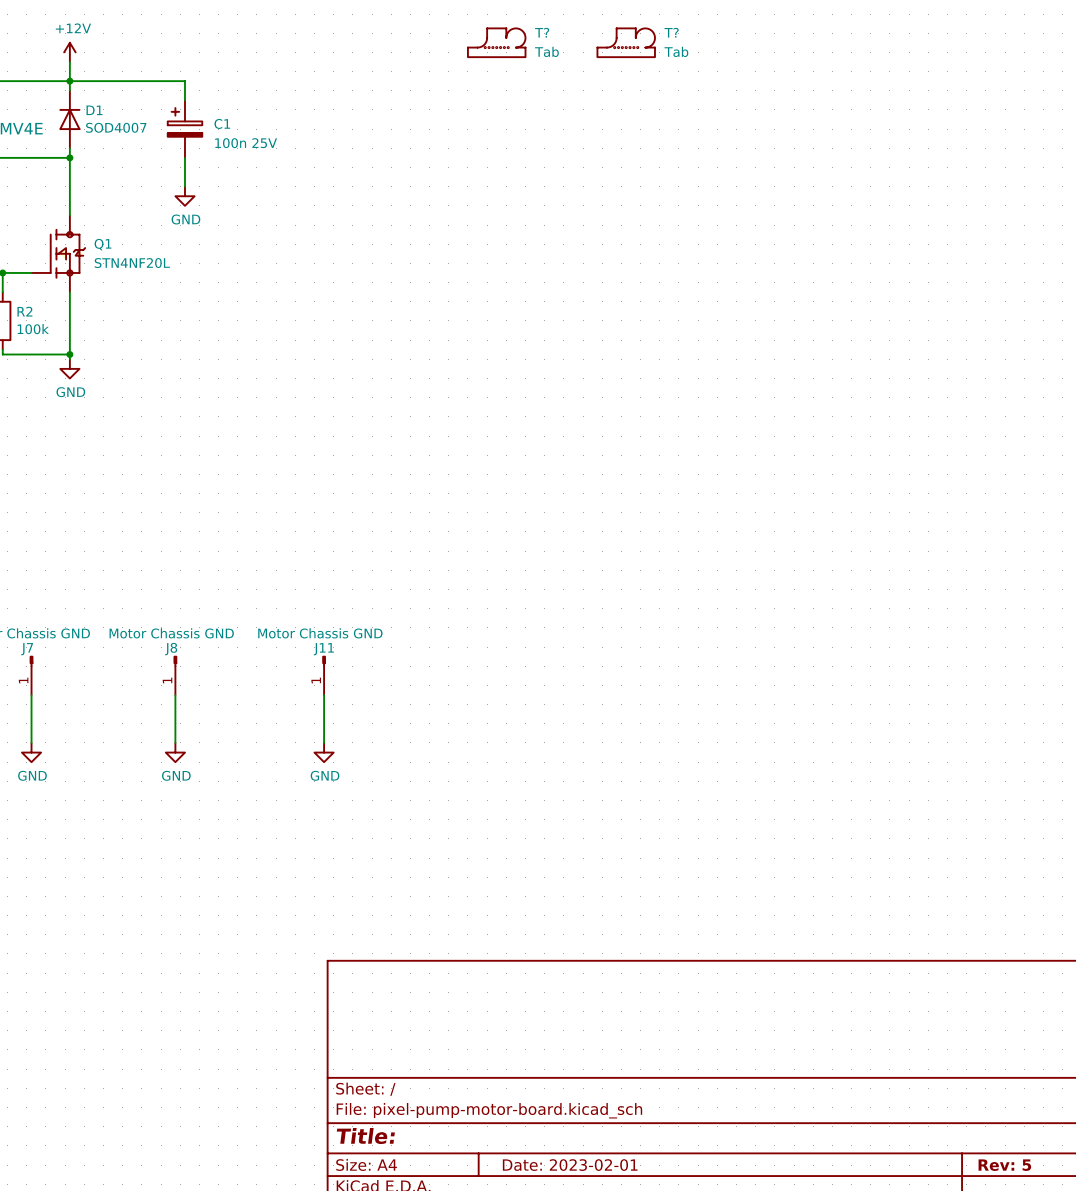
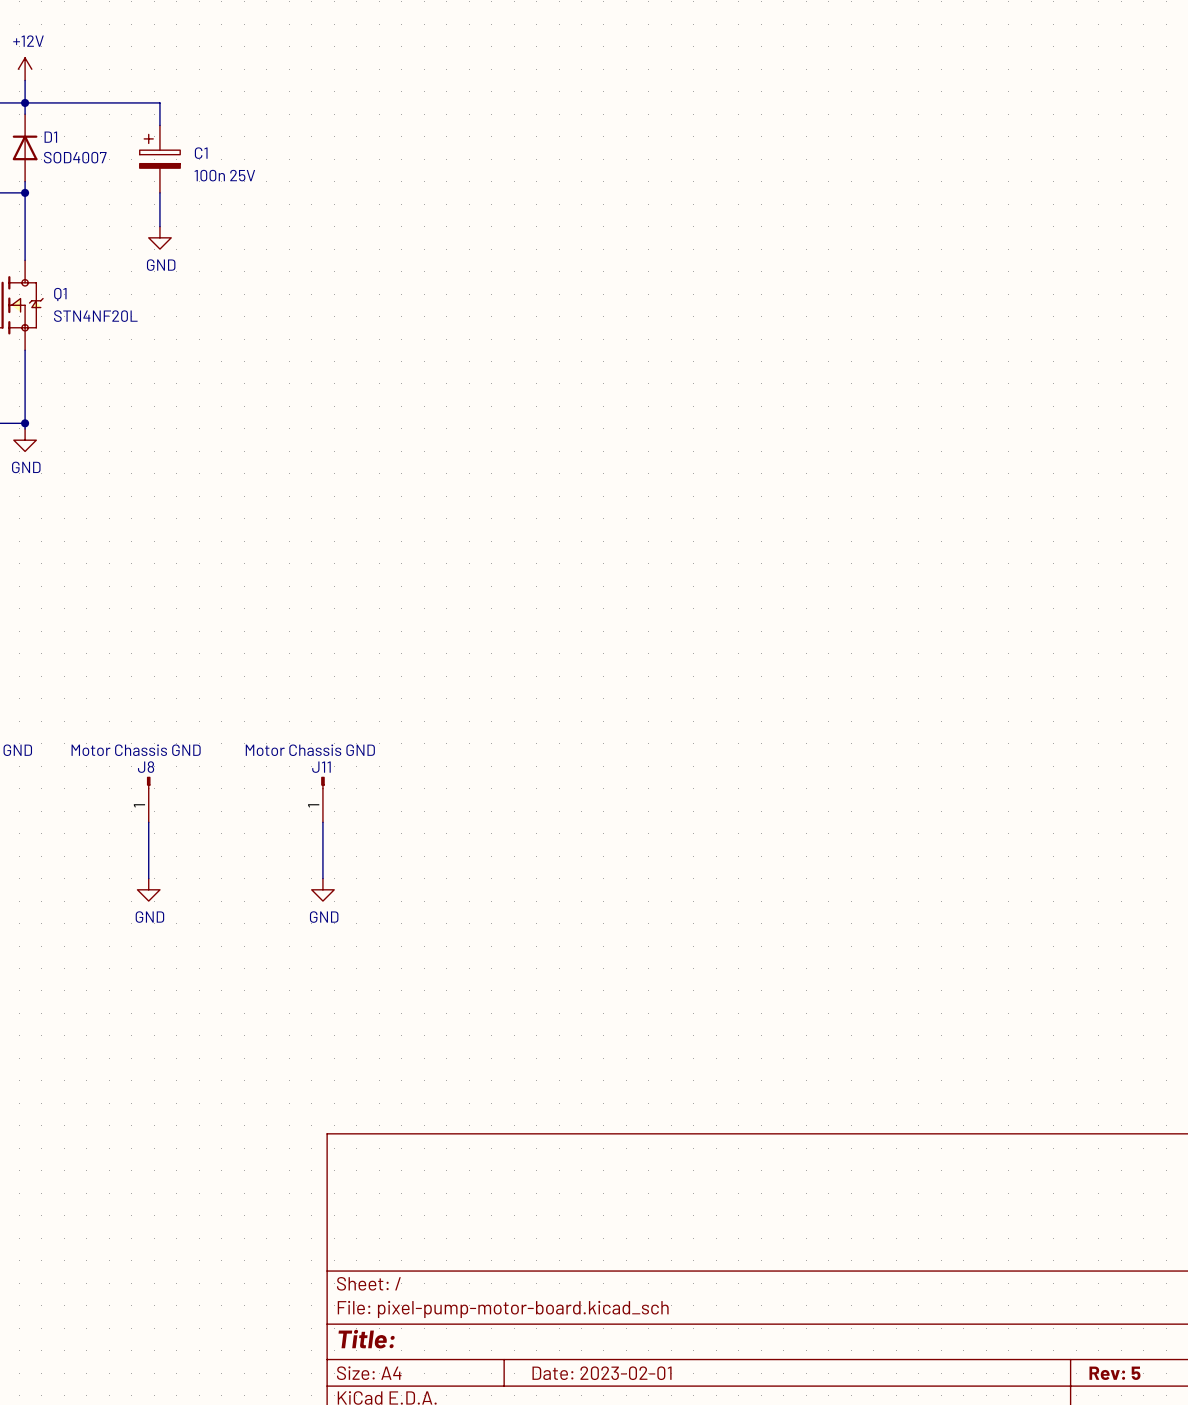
T?: Tab (496, 42) -> none
T?: Tab (626, 42) -> none

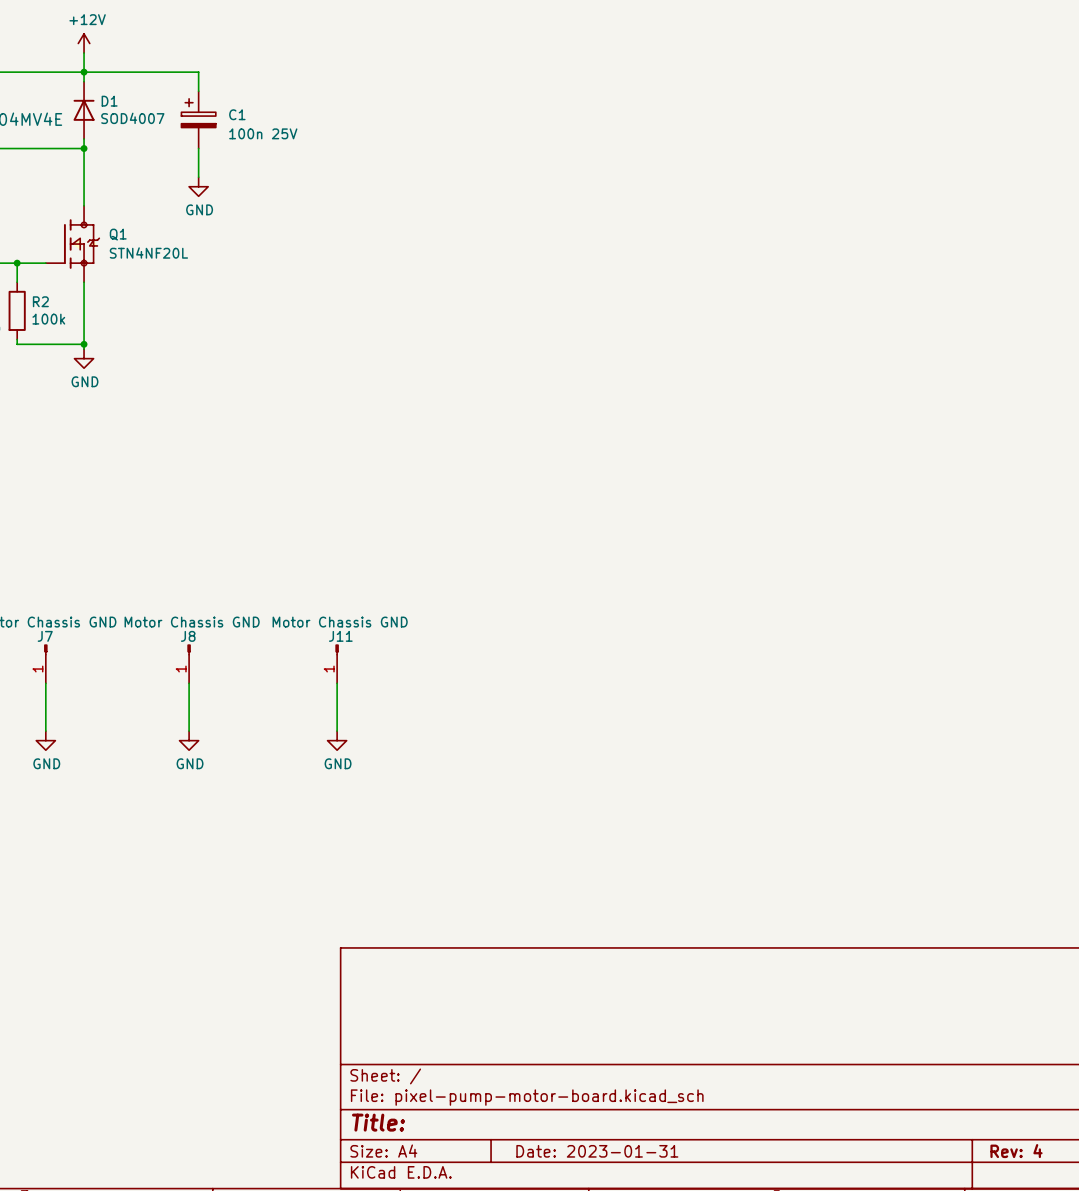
title block: Date: 2023-02-01 (602, 1373) -> Date: 2023-01-31 (597, 1151)
title block: Rev: 5 (1114, 1373) -> Rev: 4 (1016, 1151)

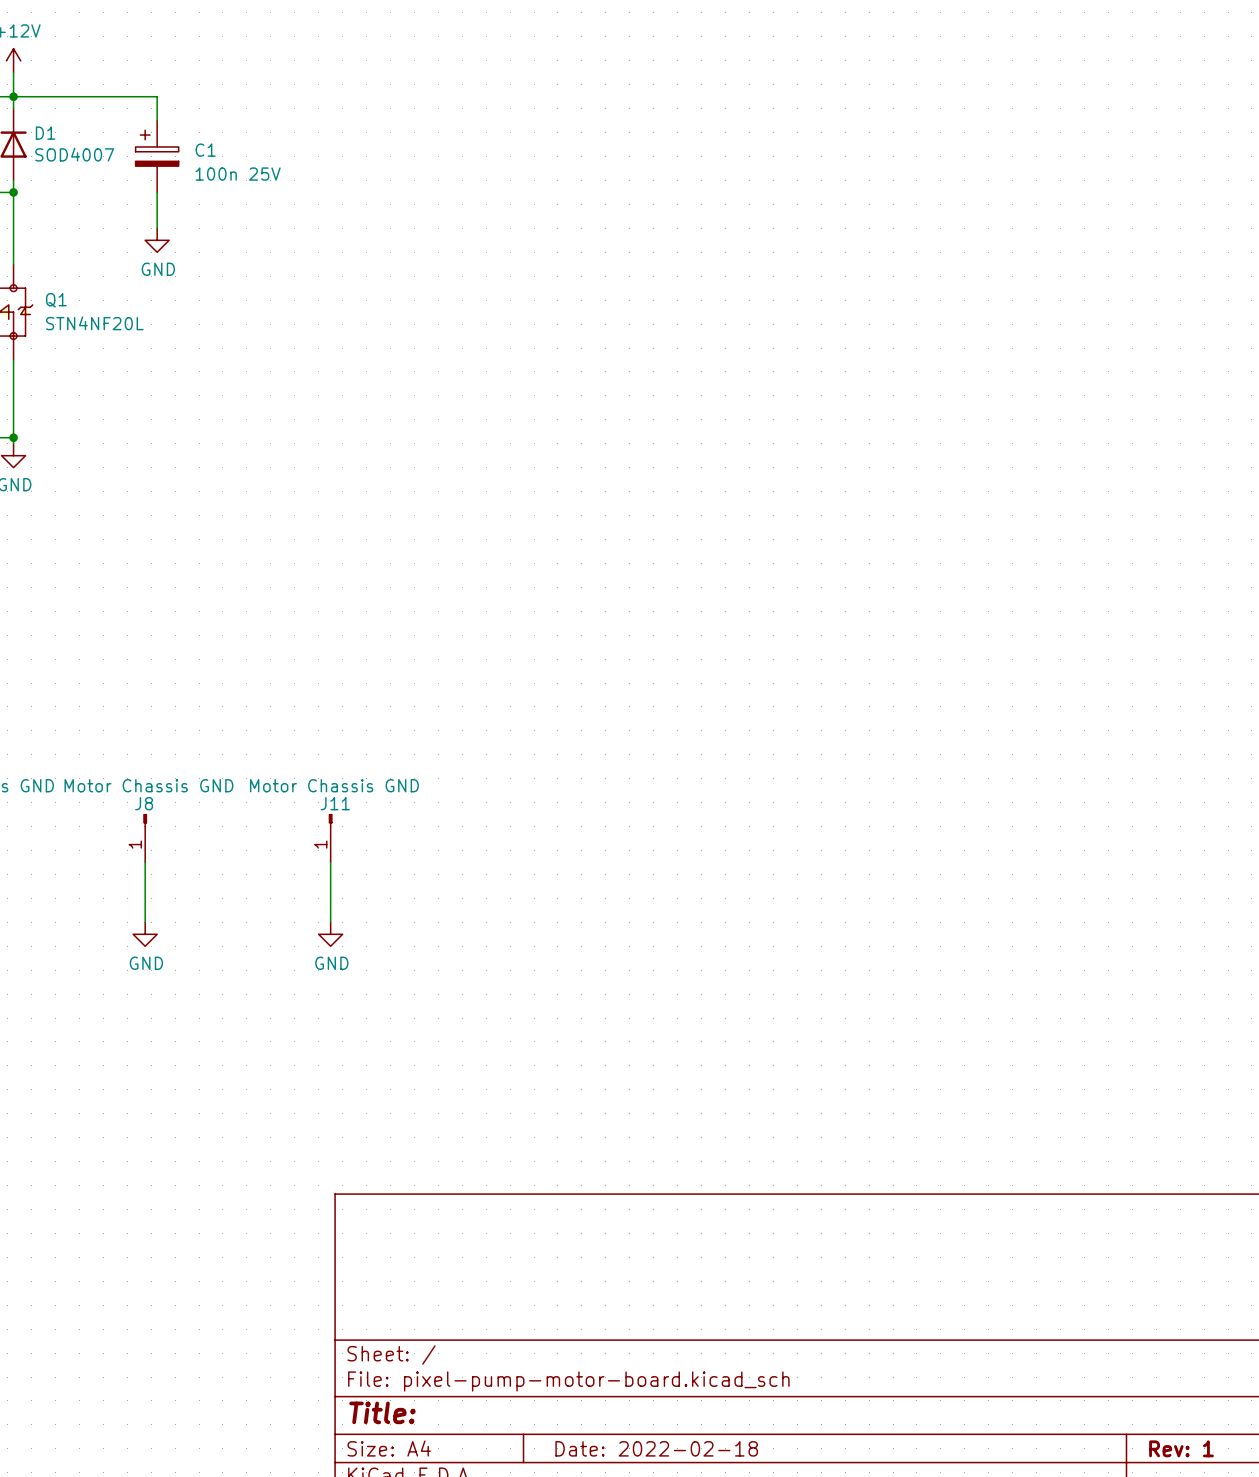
title block: Date: 2023-01-31 (597, 1151) -> Date: 2022-02-18 (656, 1448)
title block: Rev: 4 (1016, 1151) -> Rev: 1 (1181, 1448)

